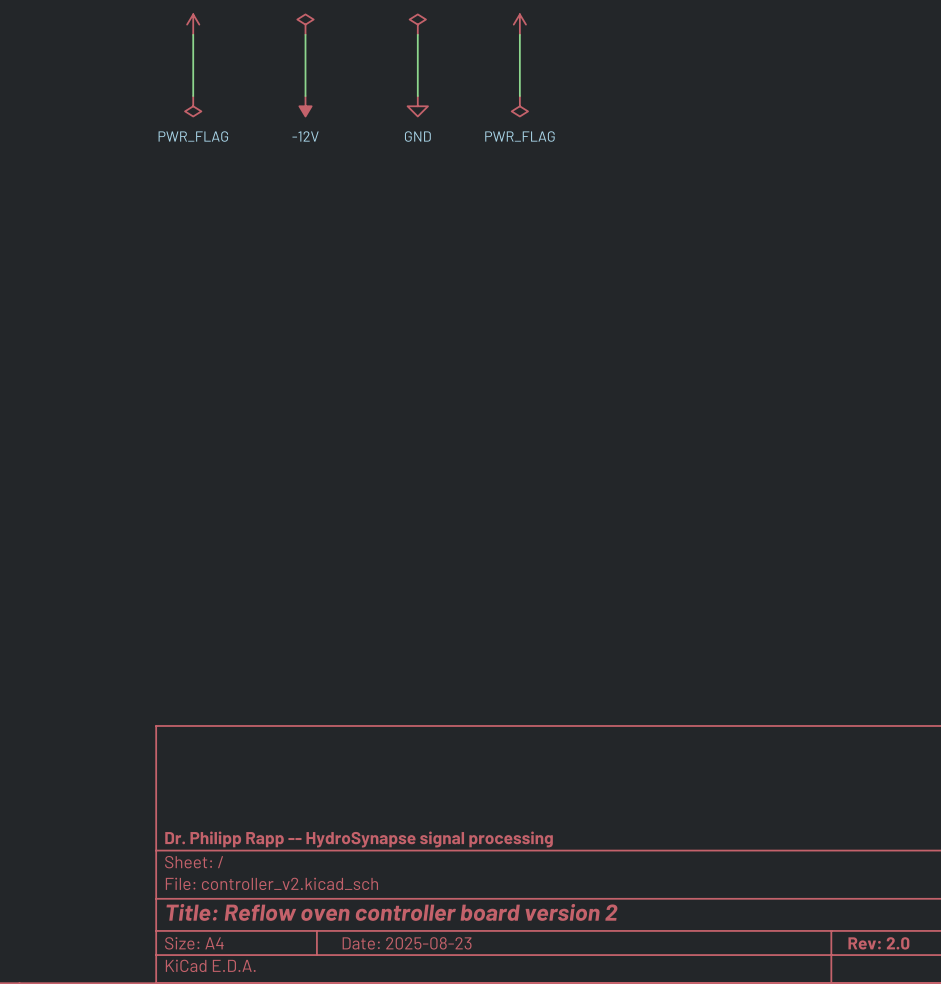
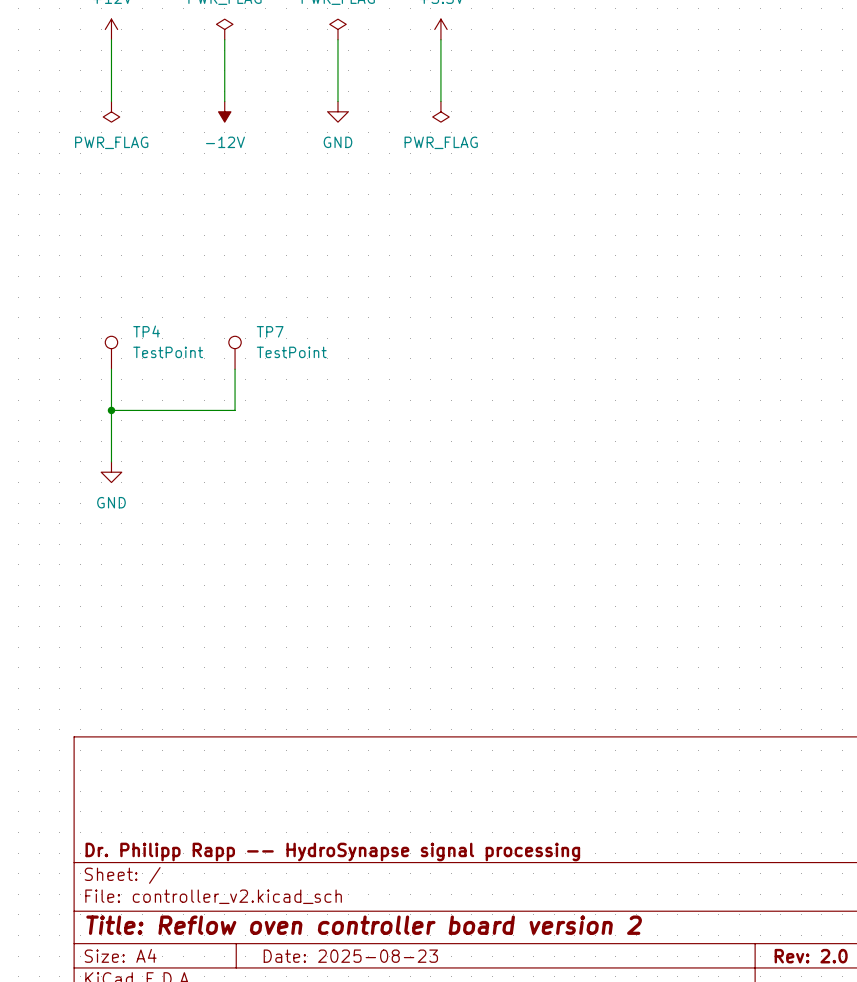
TP4: none -> TestPoint (111, 352)
TP7: none -> TestPoint (235, 352)
wire: none -> (111, 369) (111, 461)
wire: none -> (235, 369) (235, 410) (111, 410)
junction: none -> (111, 410)
power symbol: none -> GND (111, 472)

